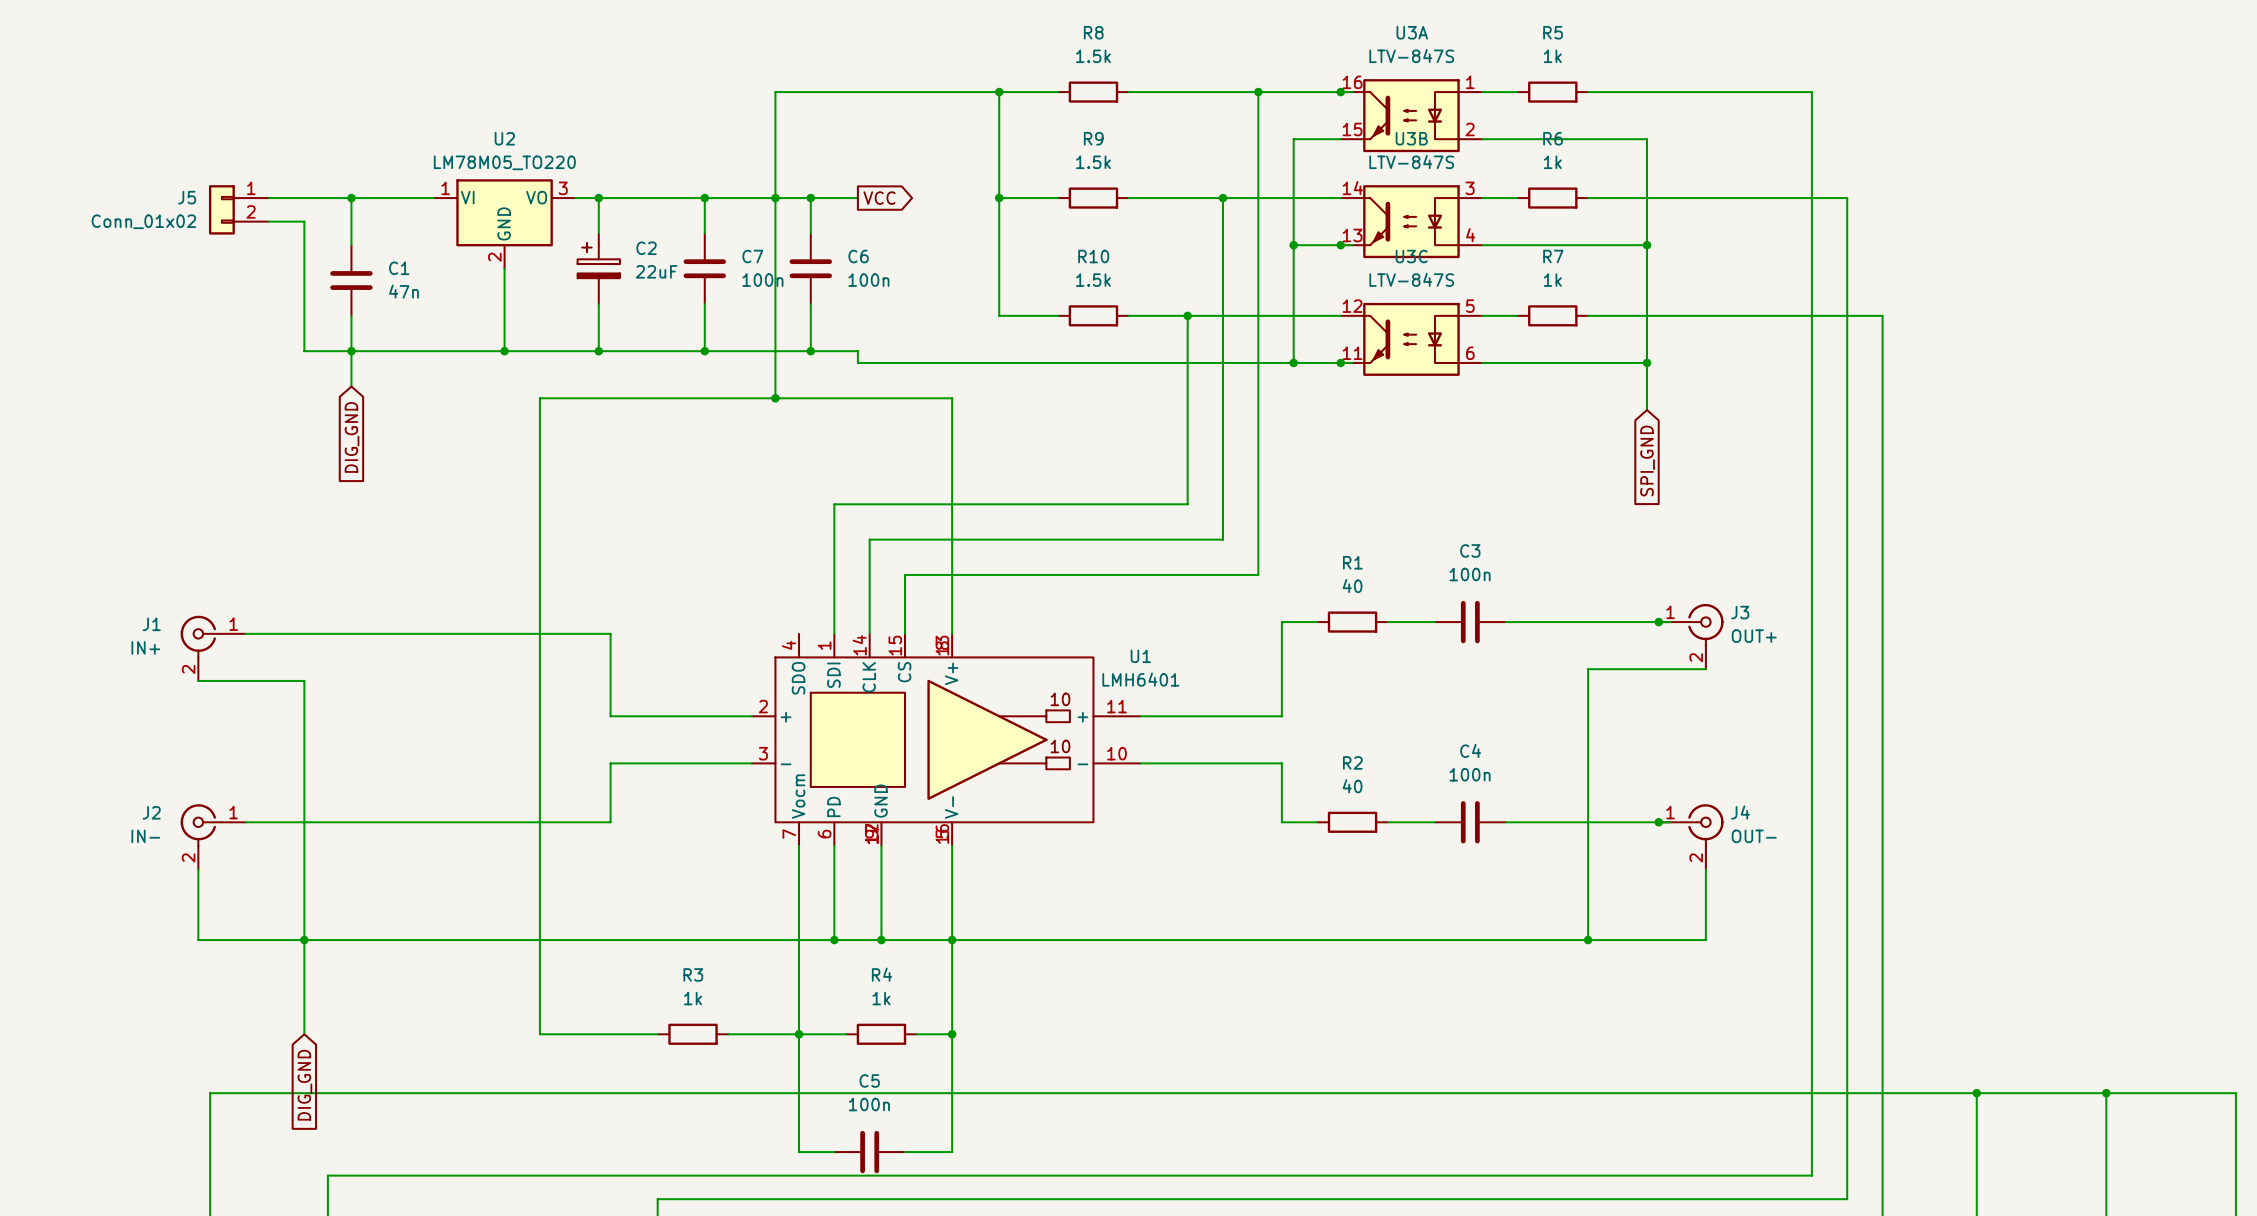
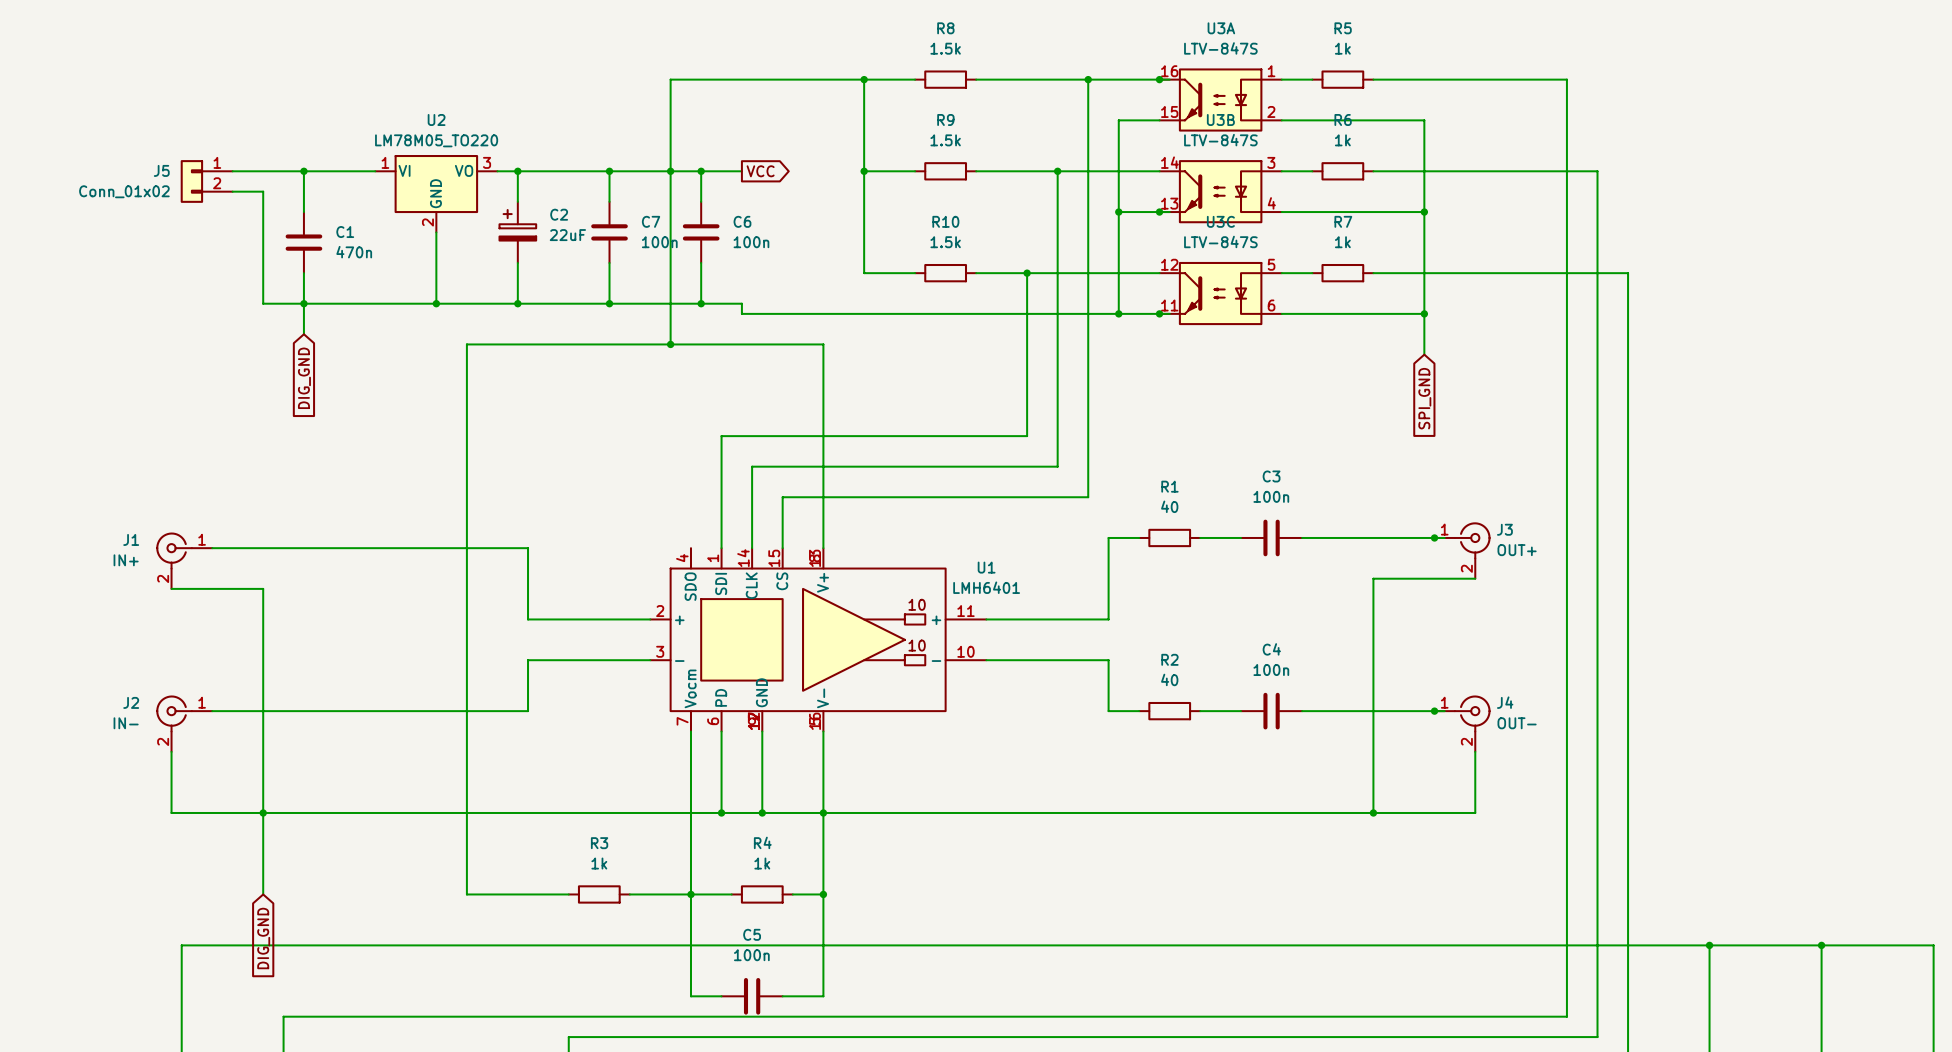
C1 value: 47n (403, 291) -> 470n (354, 252)

